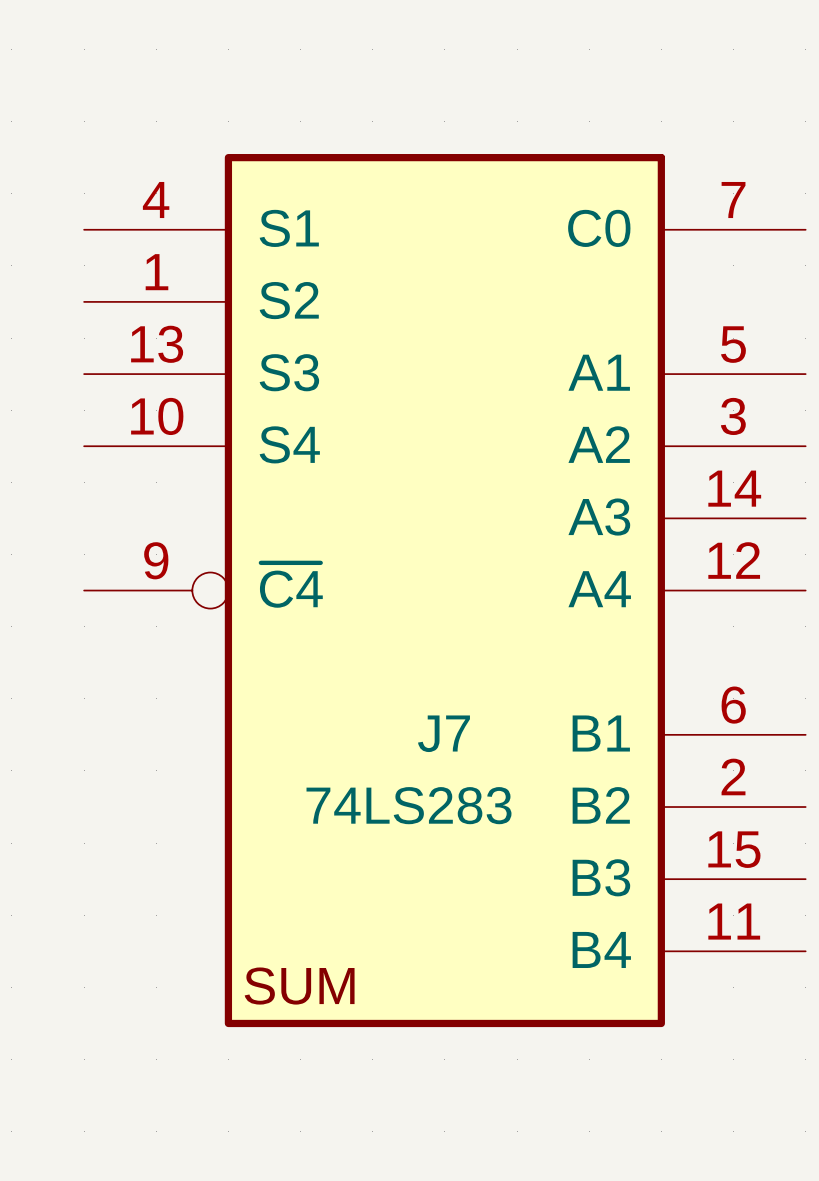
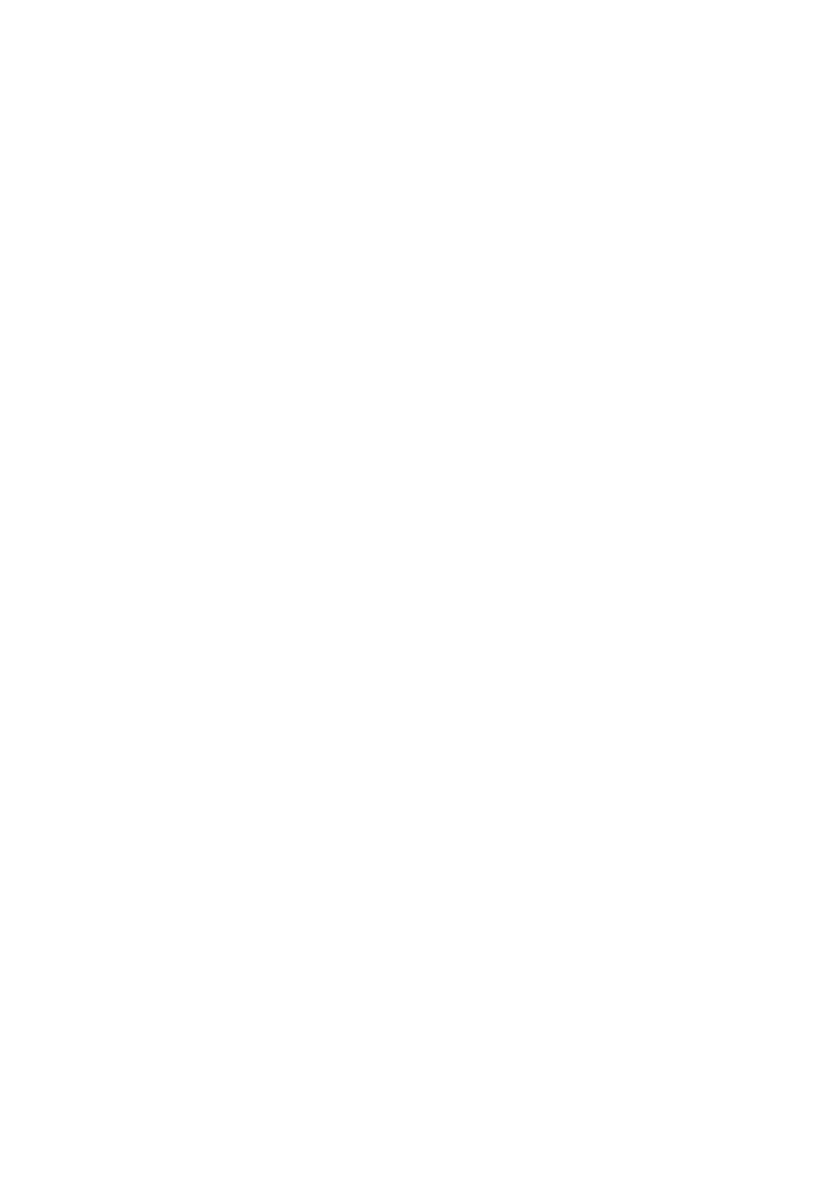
J7: 74LS283 (444, 590) -> none

